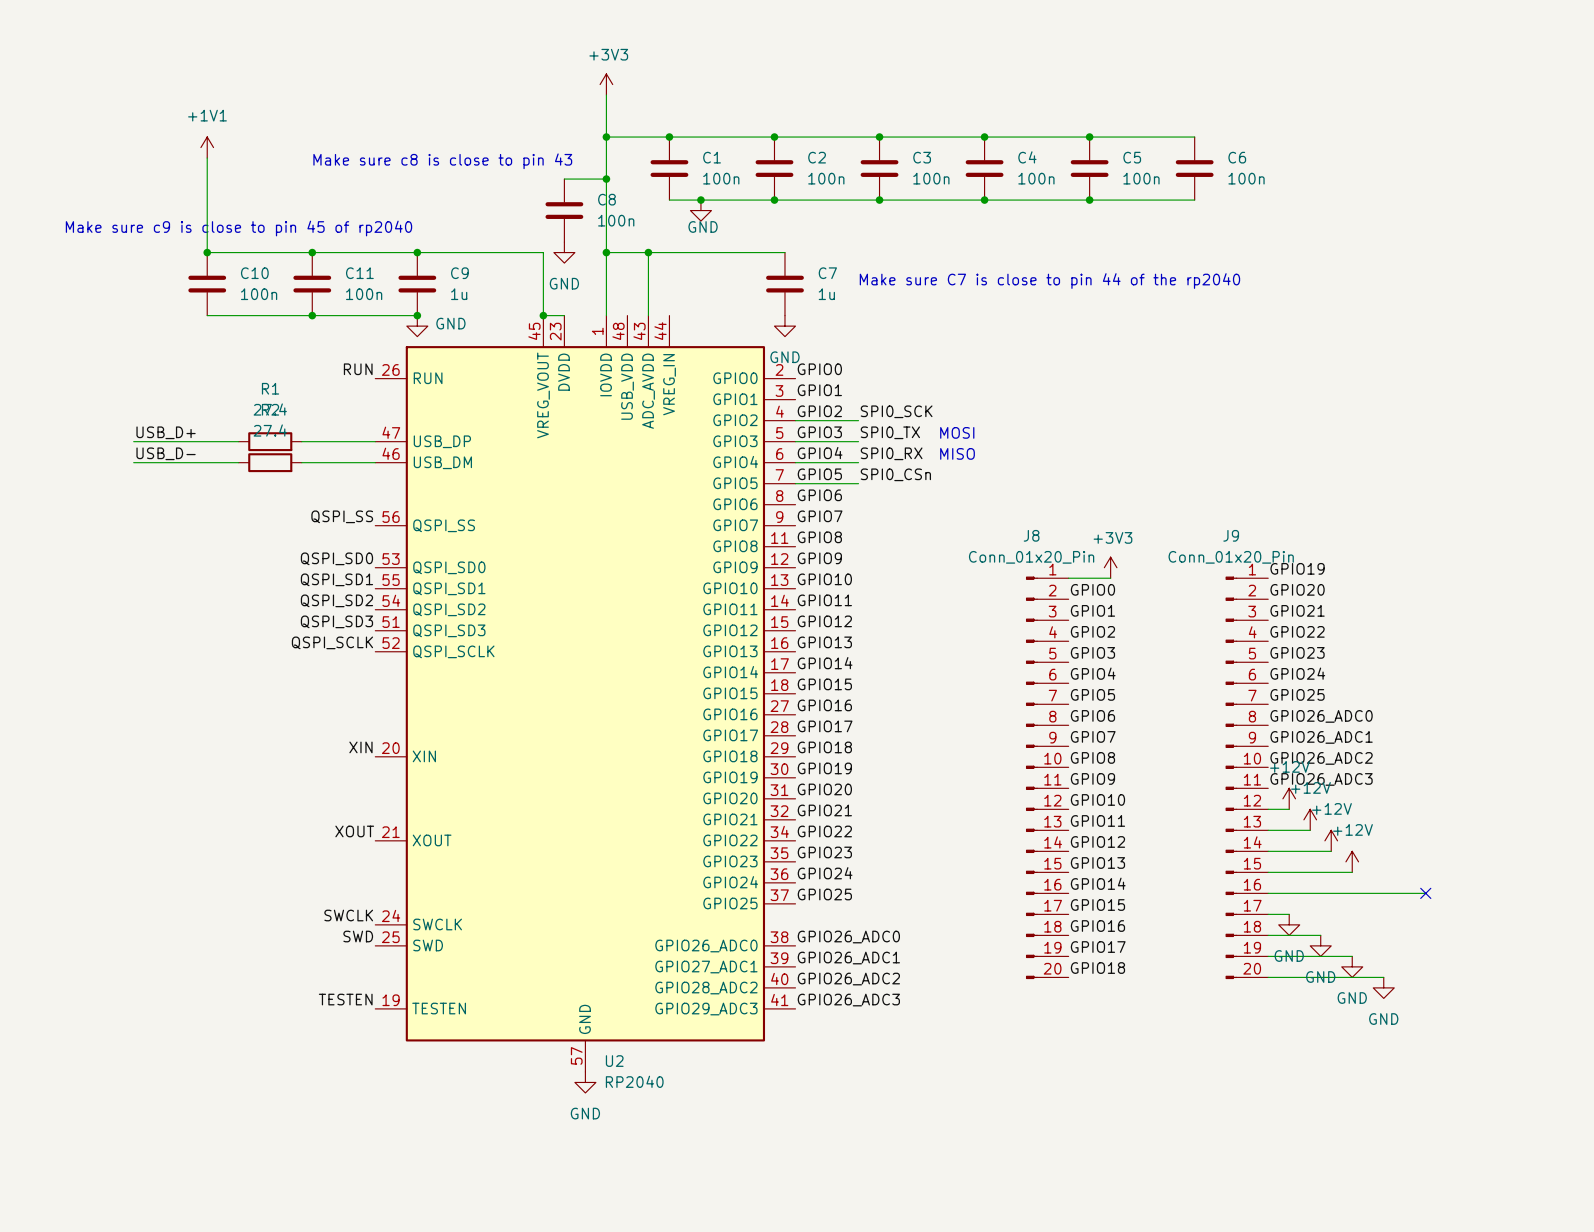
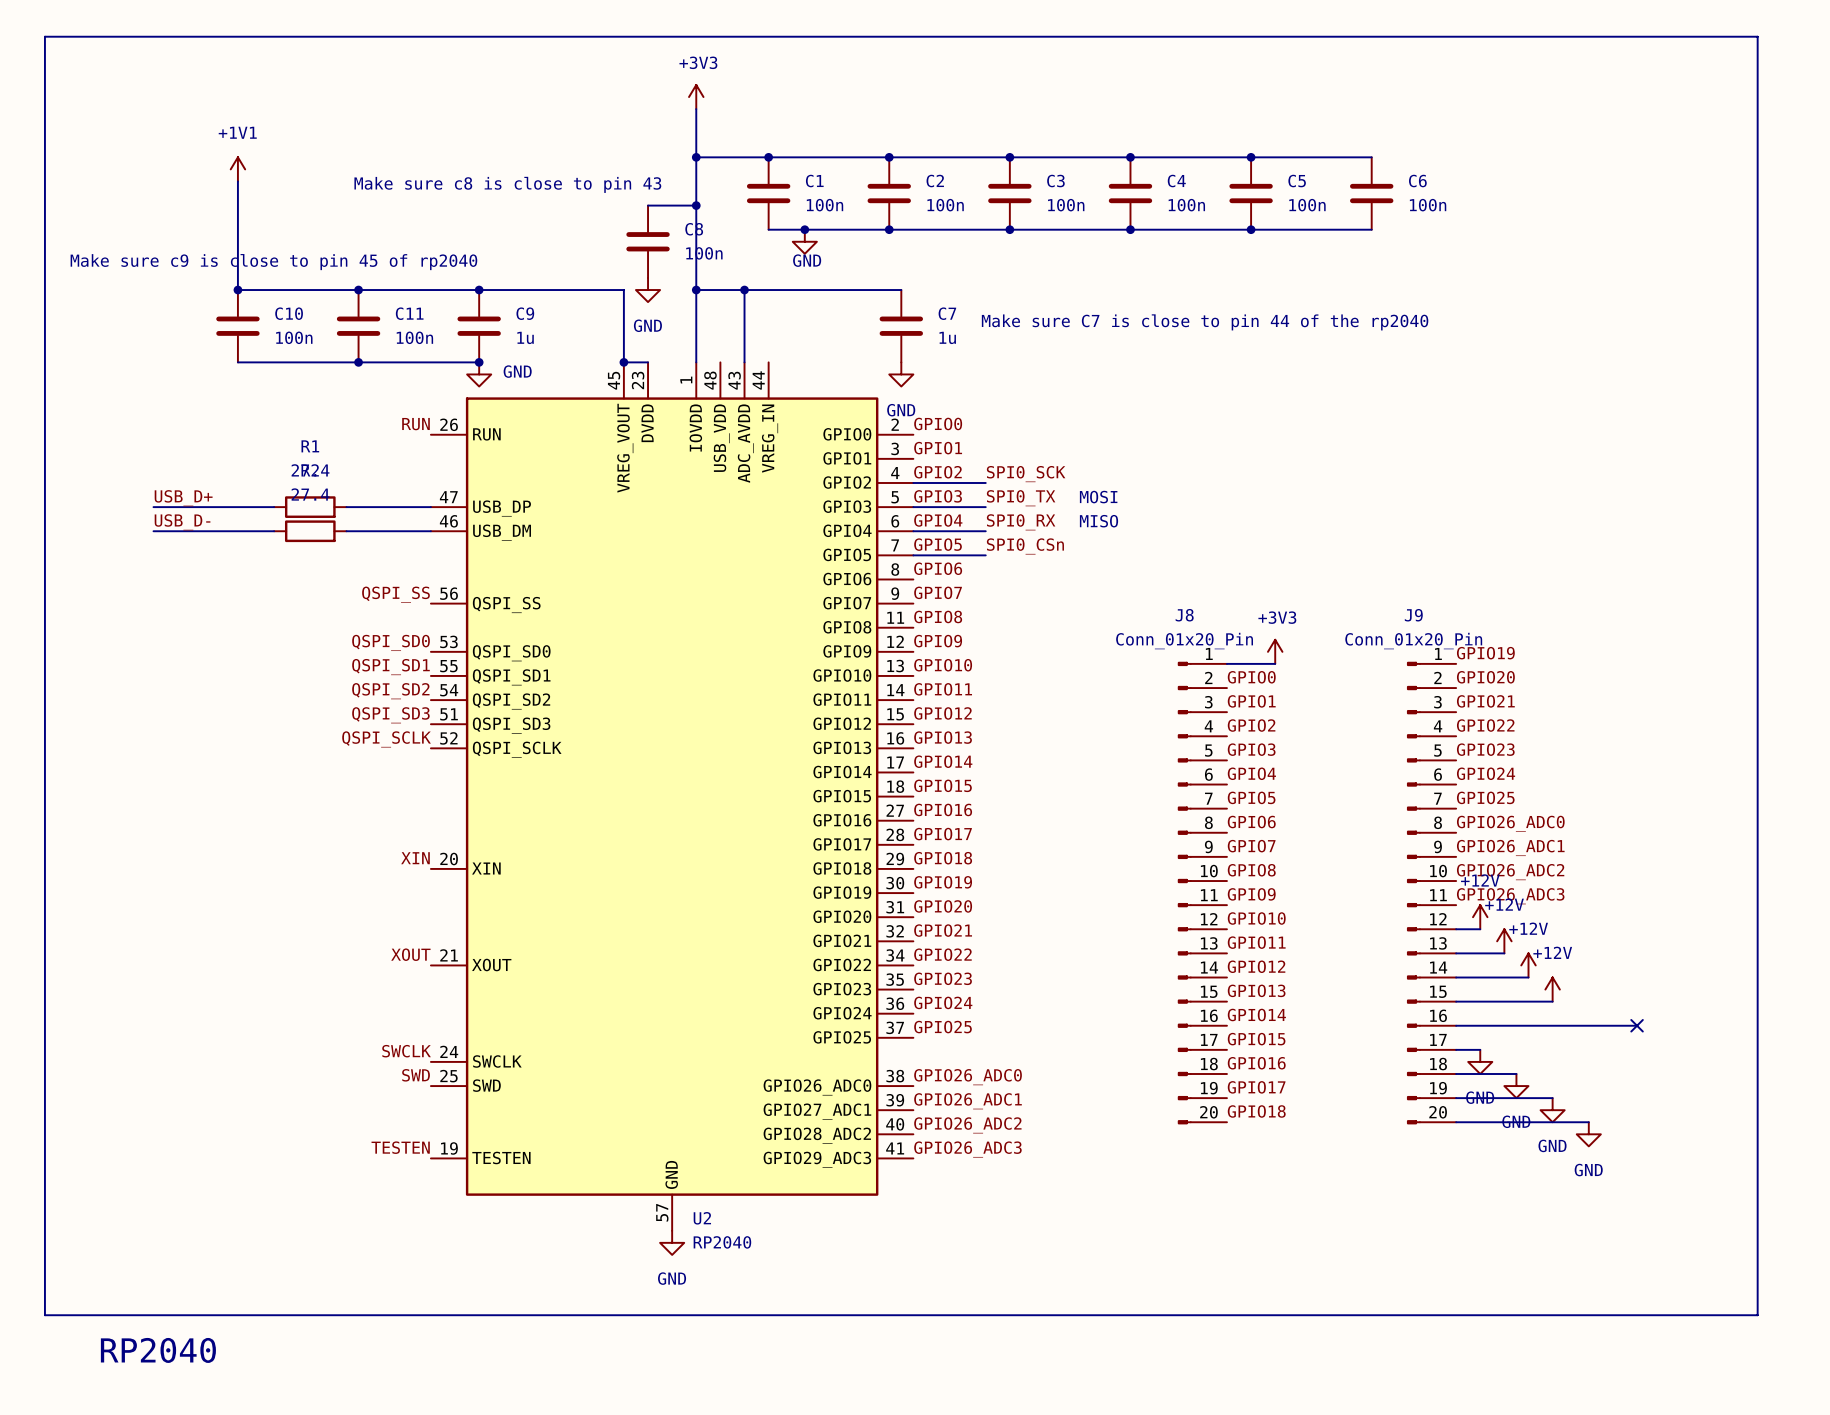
line: none -> (44, 36) (1757, 36) (1757, 1315) (44, 1315) (44, 36)
text: none -> RP2040 (158, 1350)

